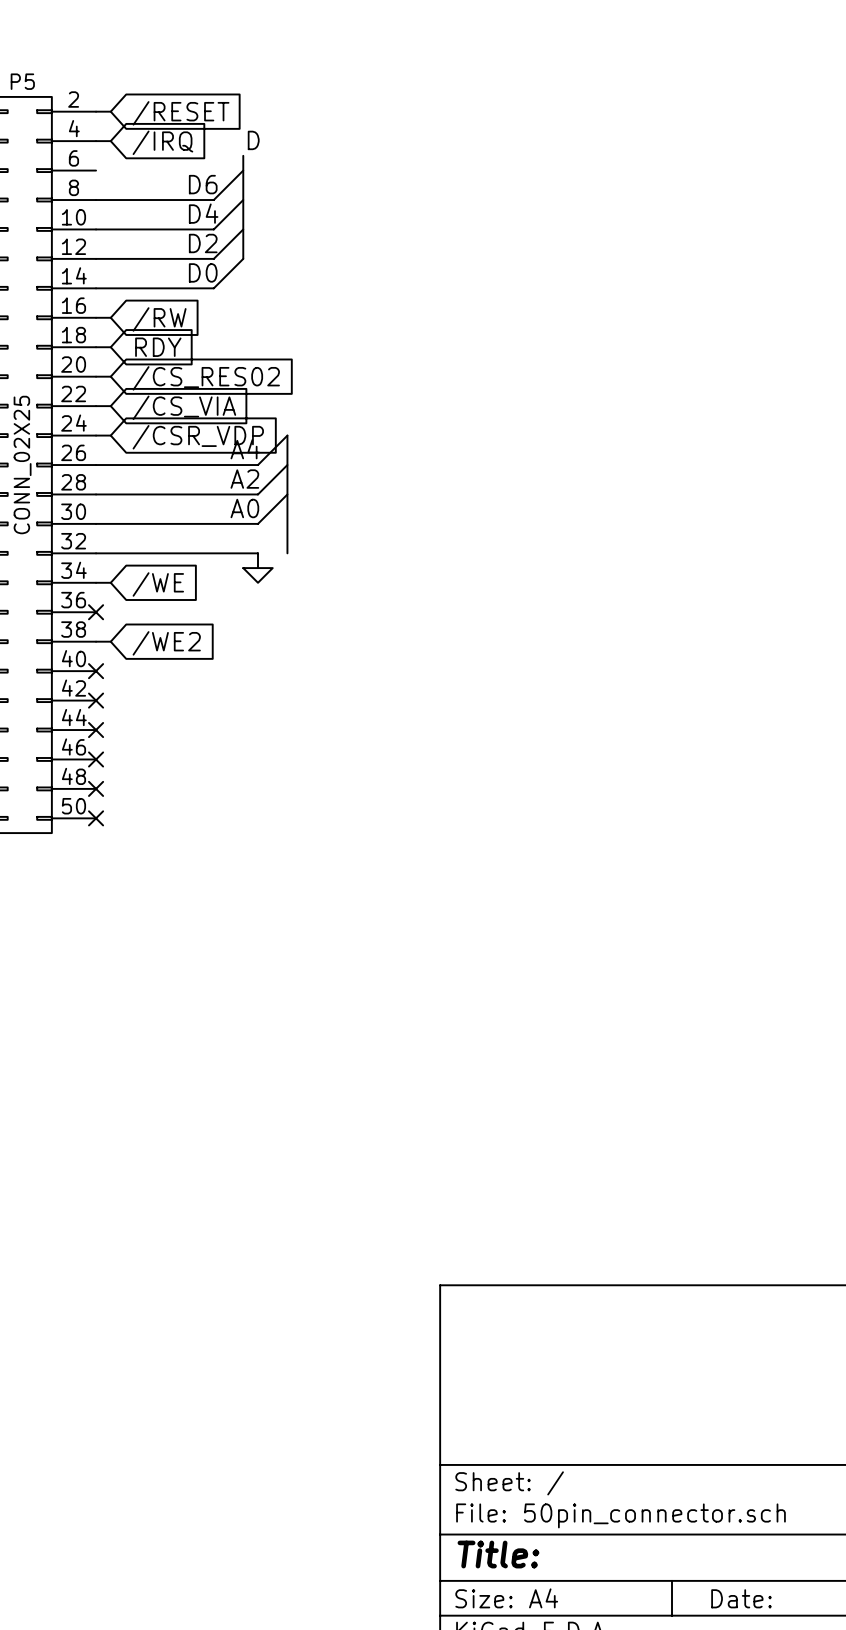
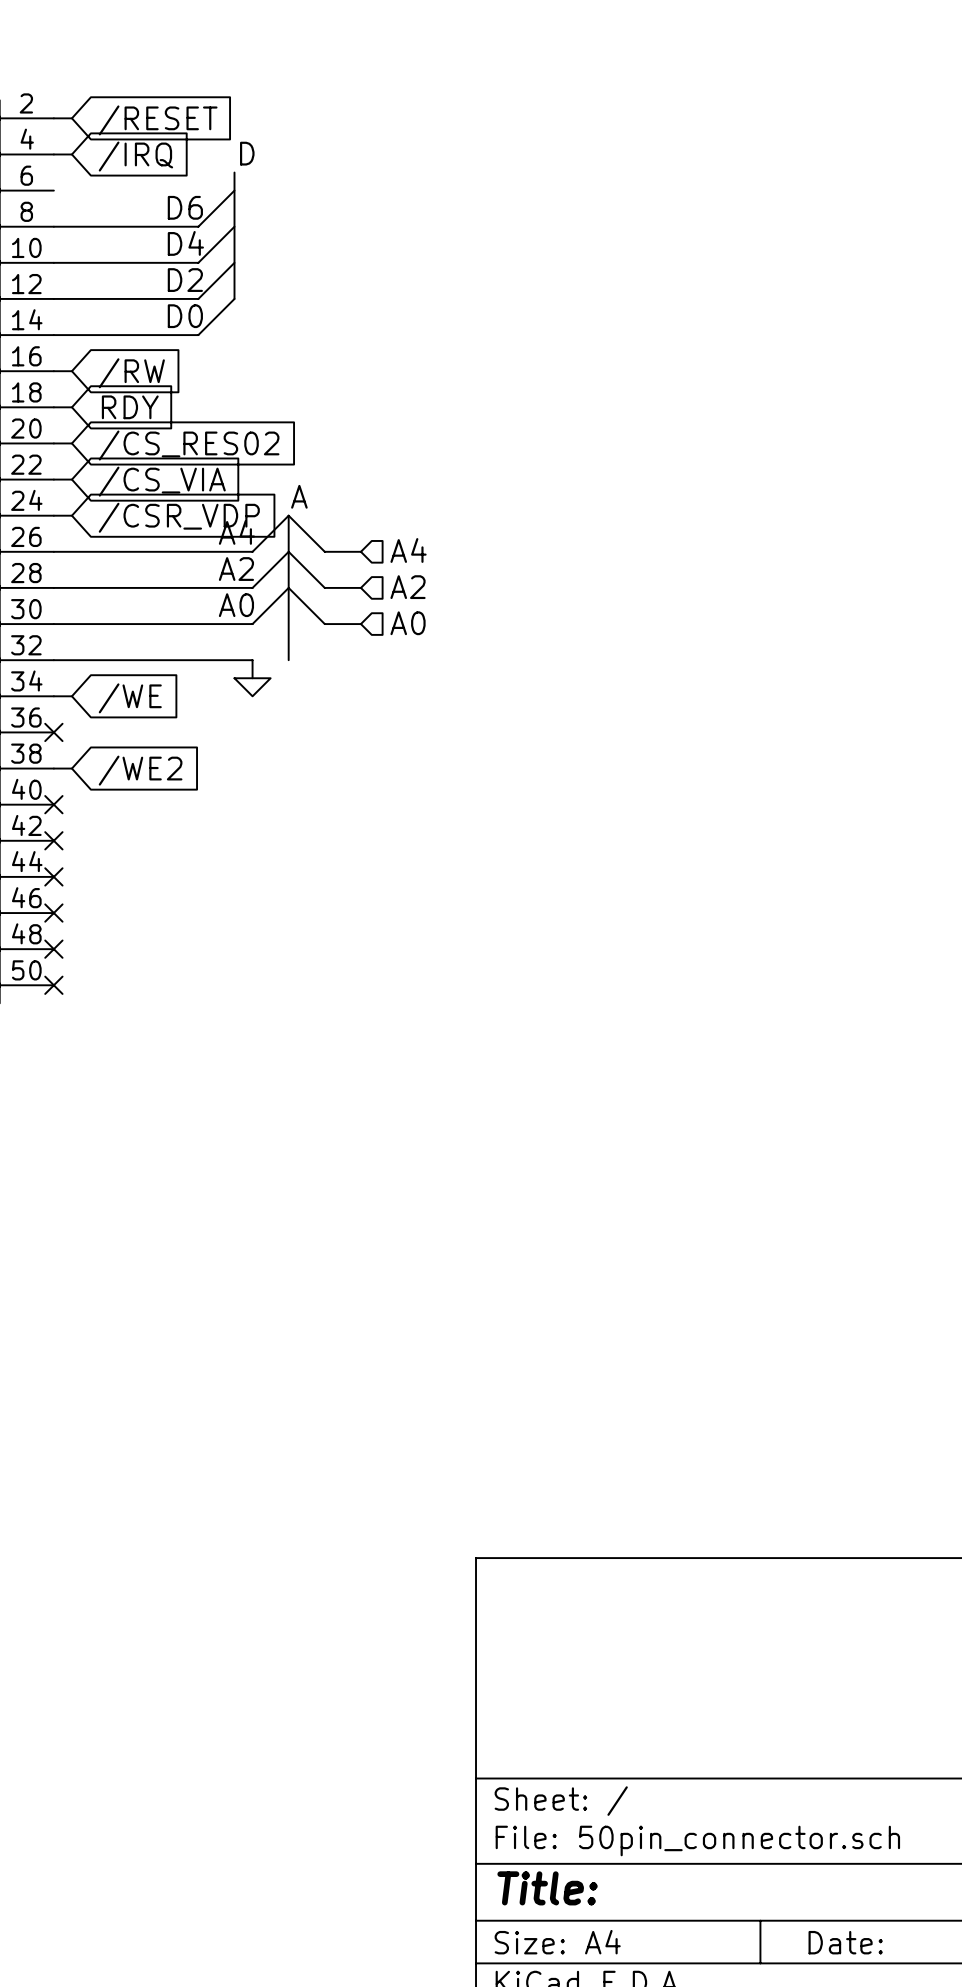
label: none -> A (299, 496)
wire: none -> (288, 515) (324, 551) (360, 551)
hierarchical label: none -> A4 (408, 550)
wire: none -> (288, 551) (324, 587) (360, 587)
hierarchical label: none -> A2 (408, 587)
wire: none -> (288, 587) (324, 624) (360, 624)
hierarchical label: none -> A0 (408, 623)

